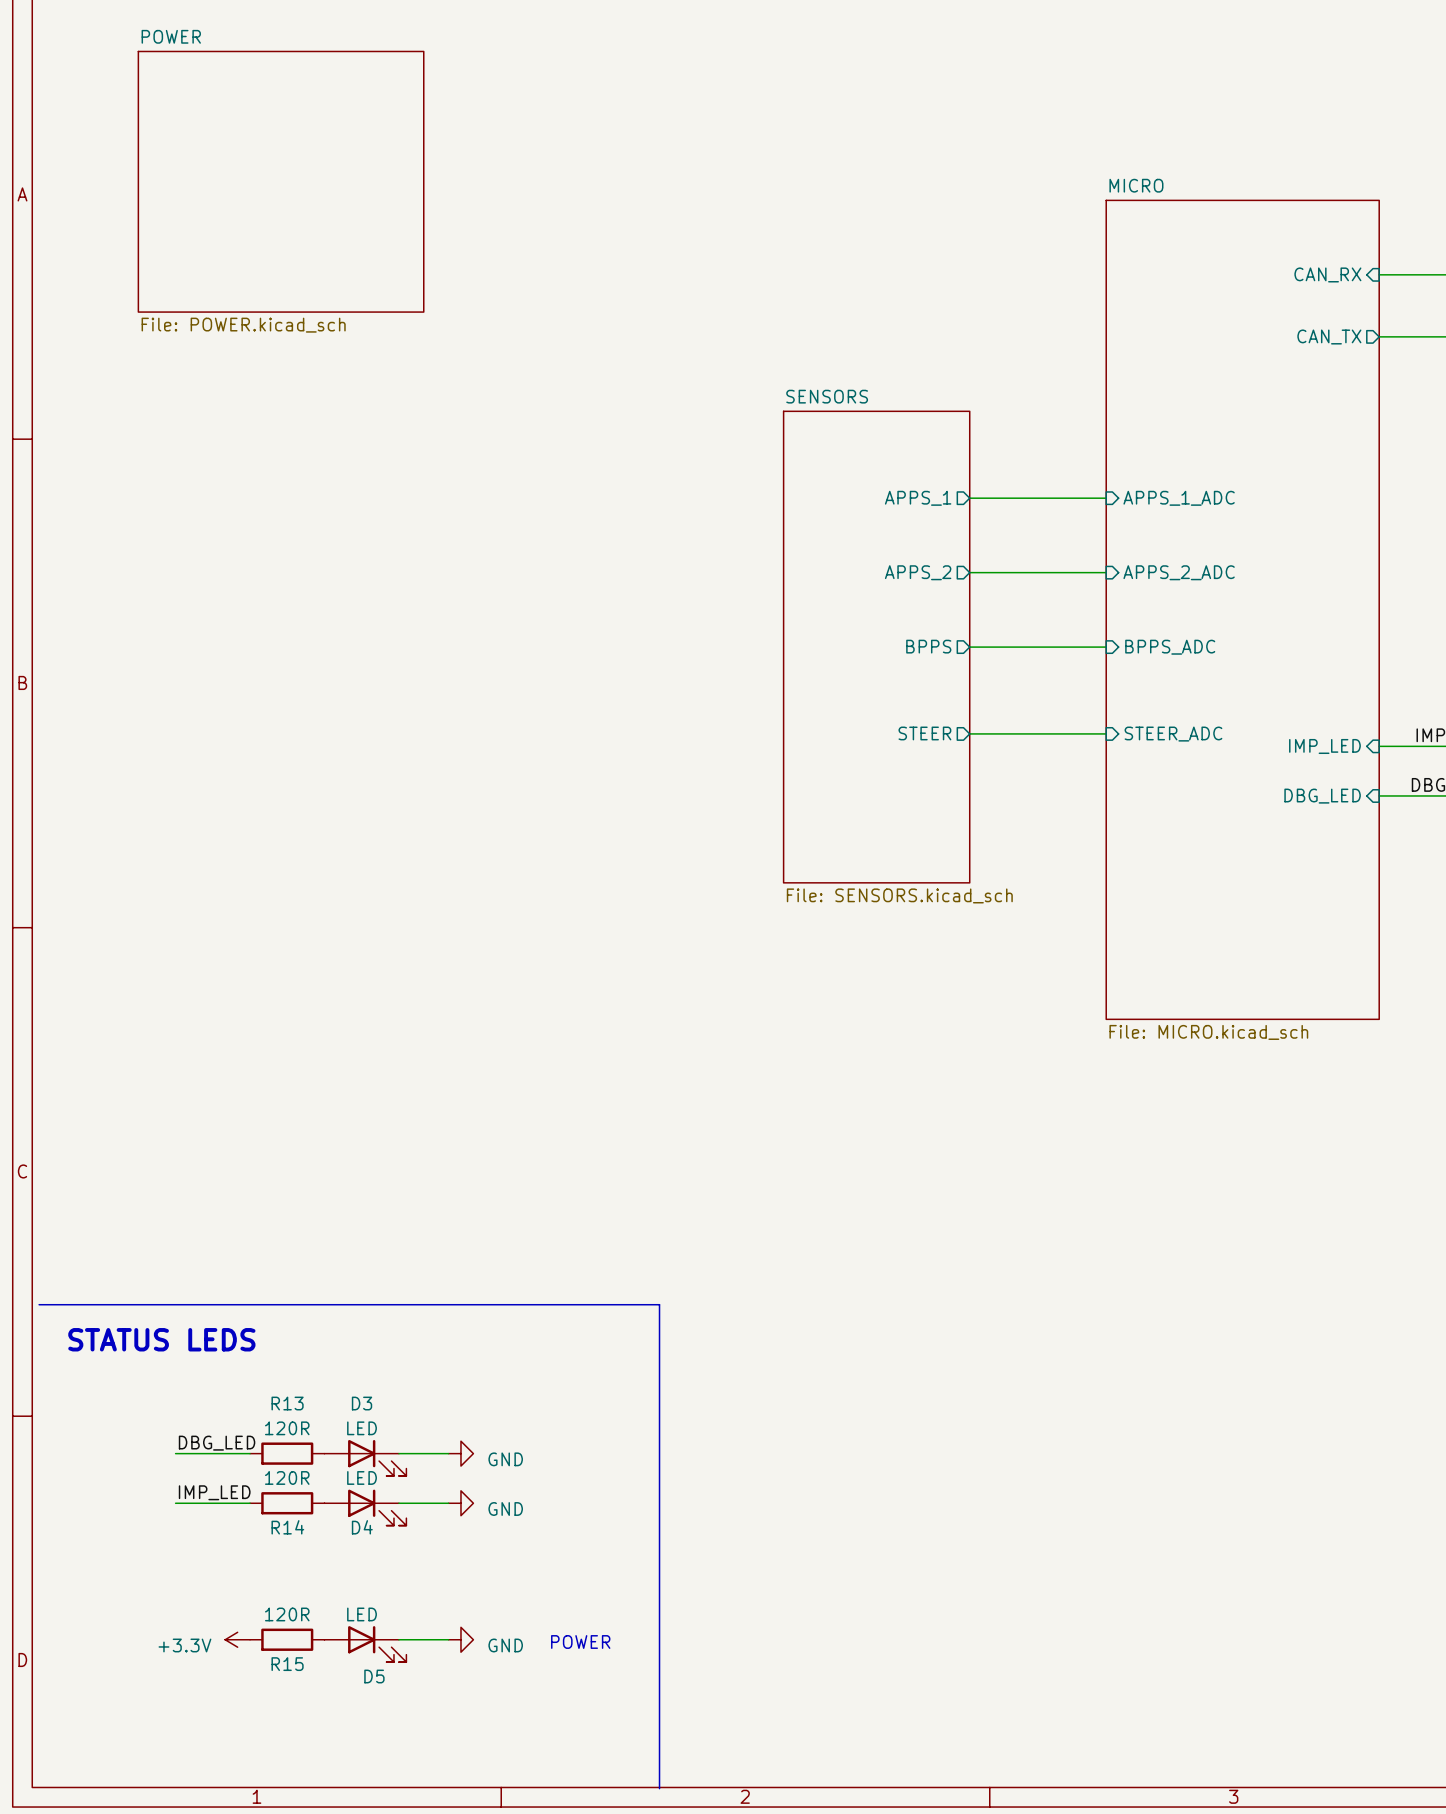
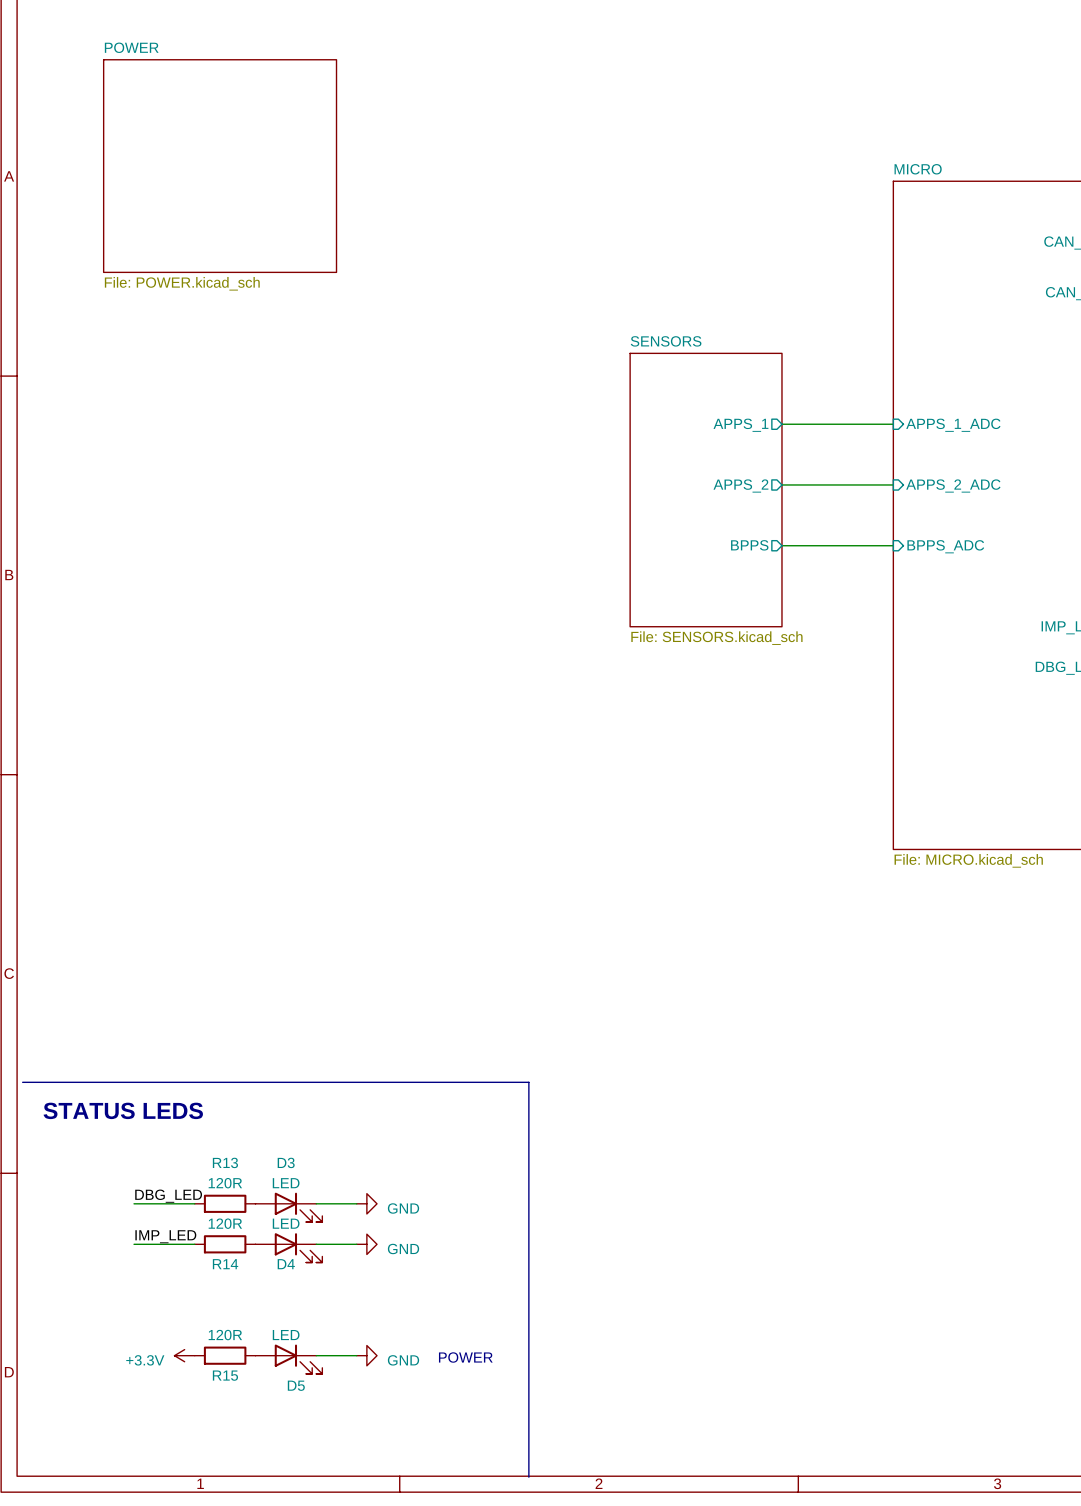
sheet SENSORS: none -> File: SENSORS.kicad_sch (706, 490)
sheet SENSORS: File: SENSORS.kicad_sch (876, 647) -> none
sheet pin: STEER (924, 733) -> none
wire: (969, 733) (1106, 733) -> none
sheet pin: STEER_ADC (1173, 734) -> none

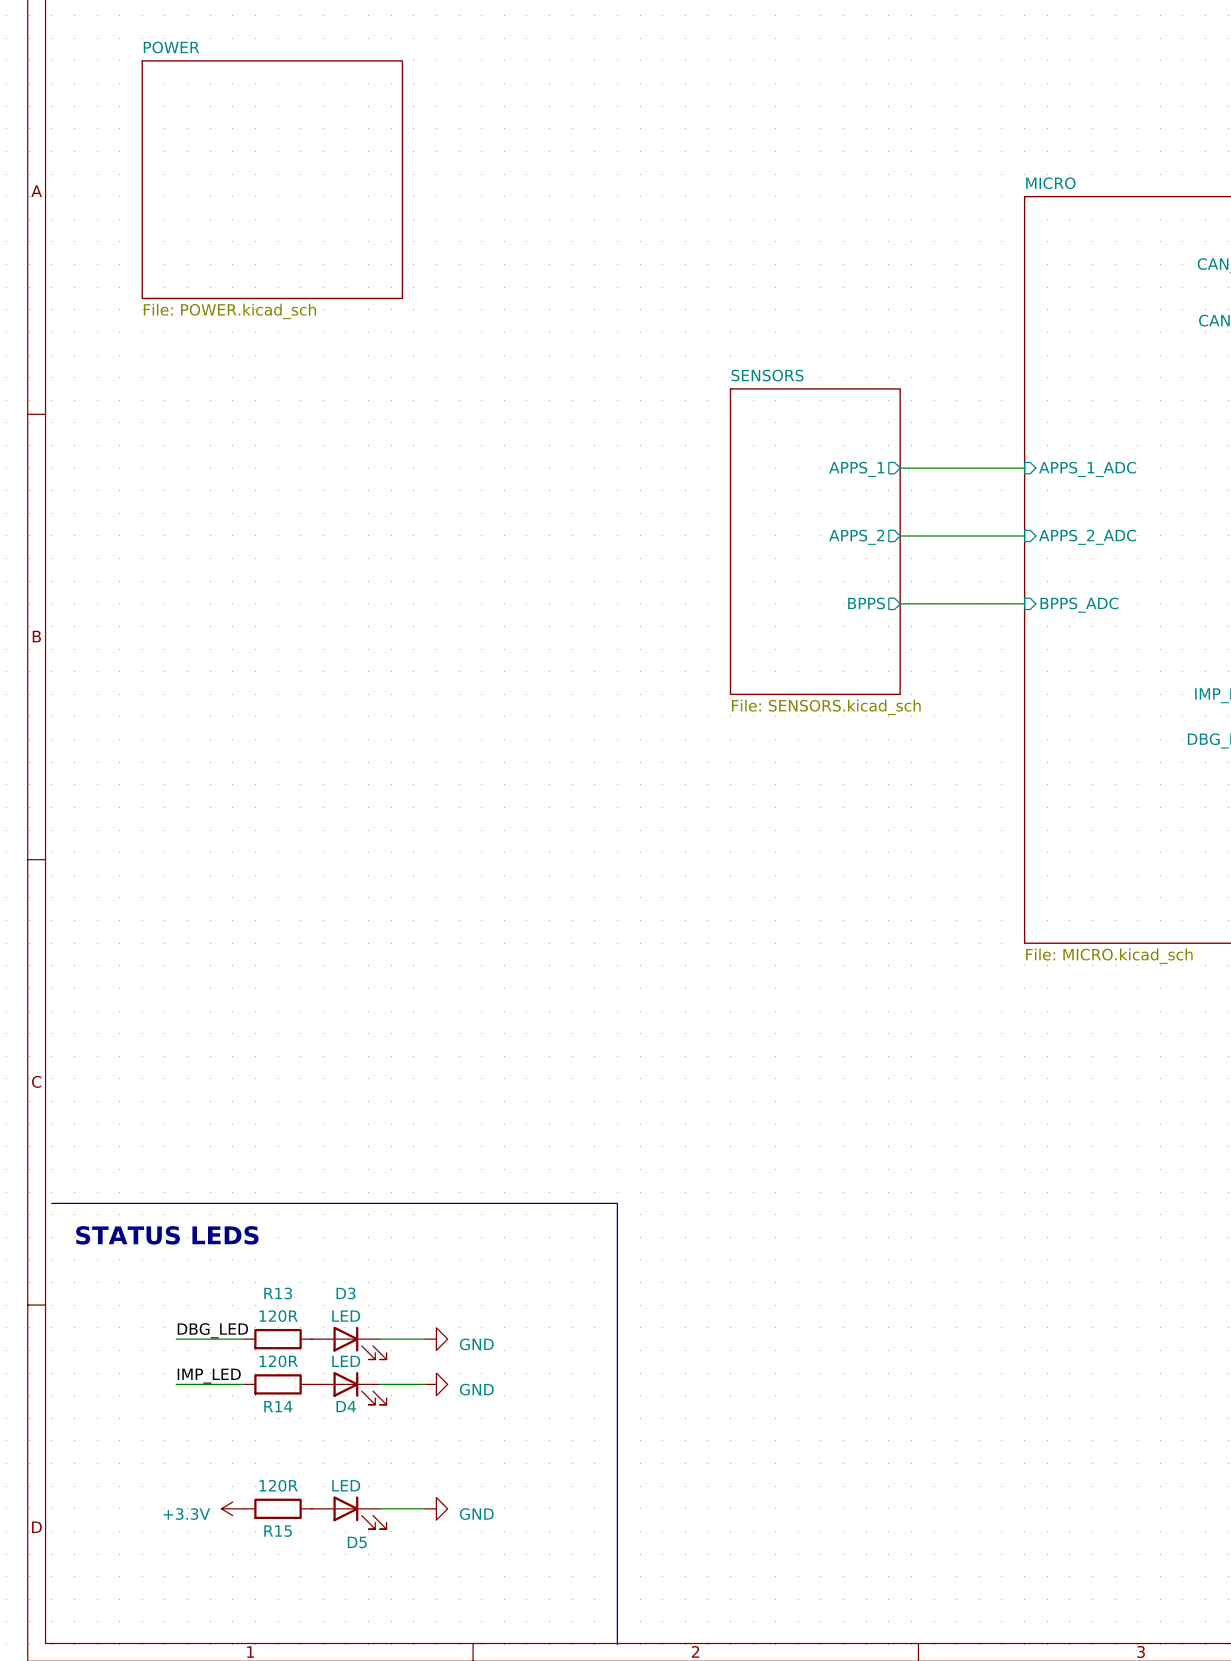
text: POWER (465, 1357) -> none

